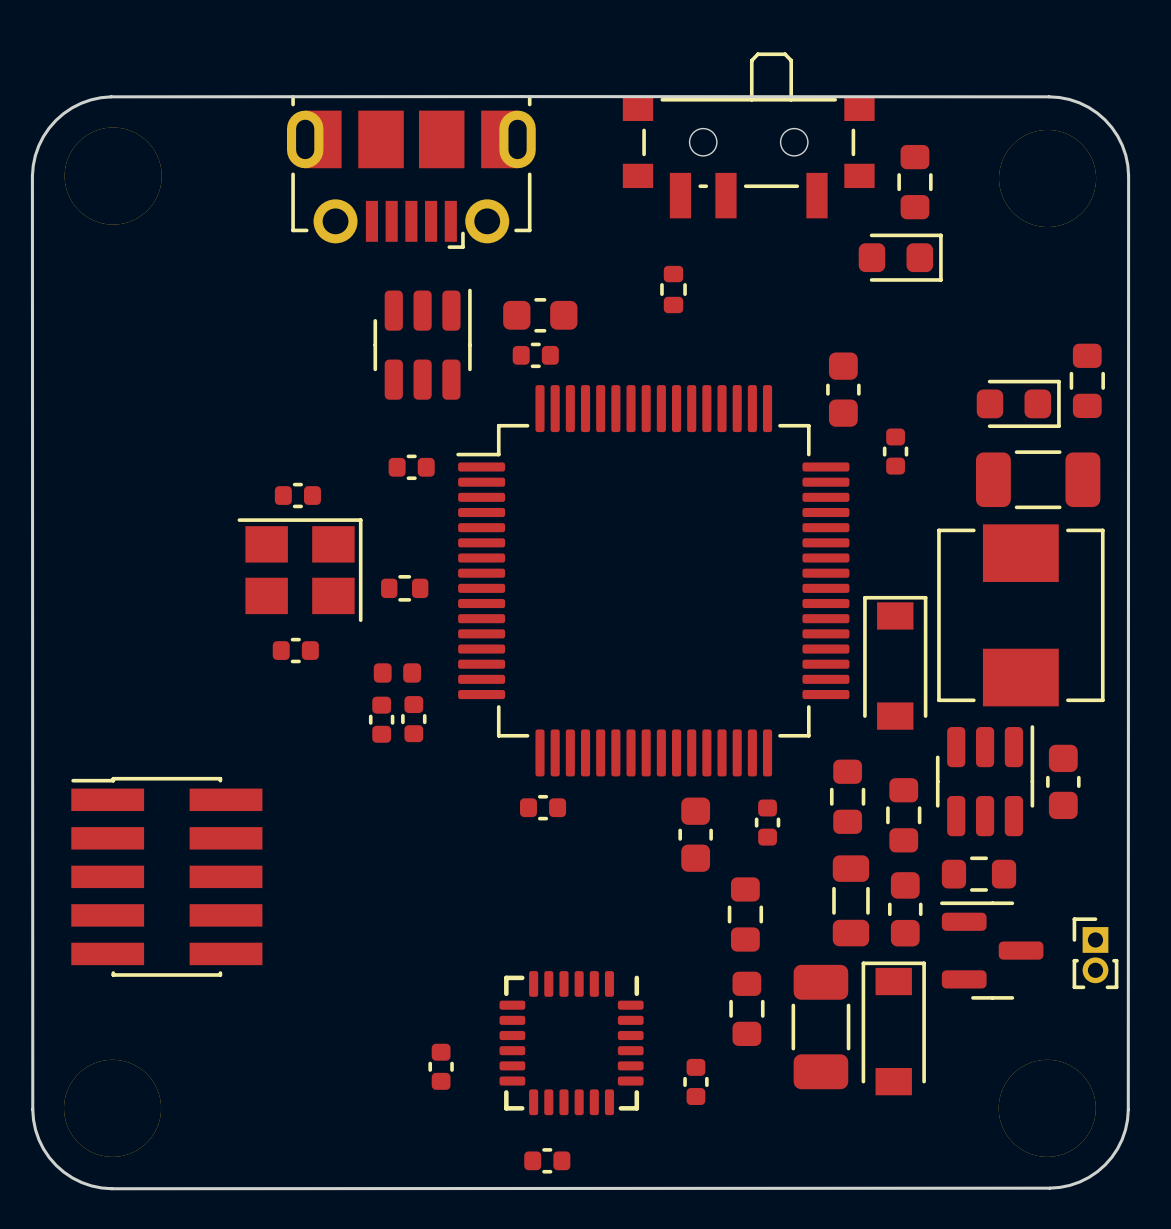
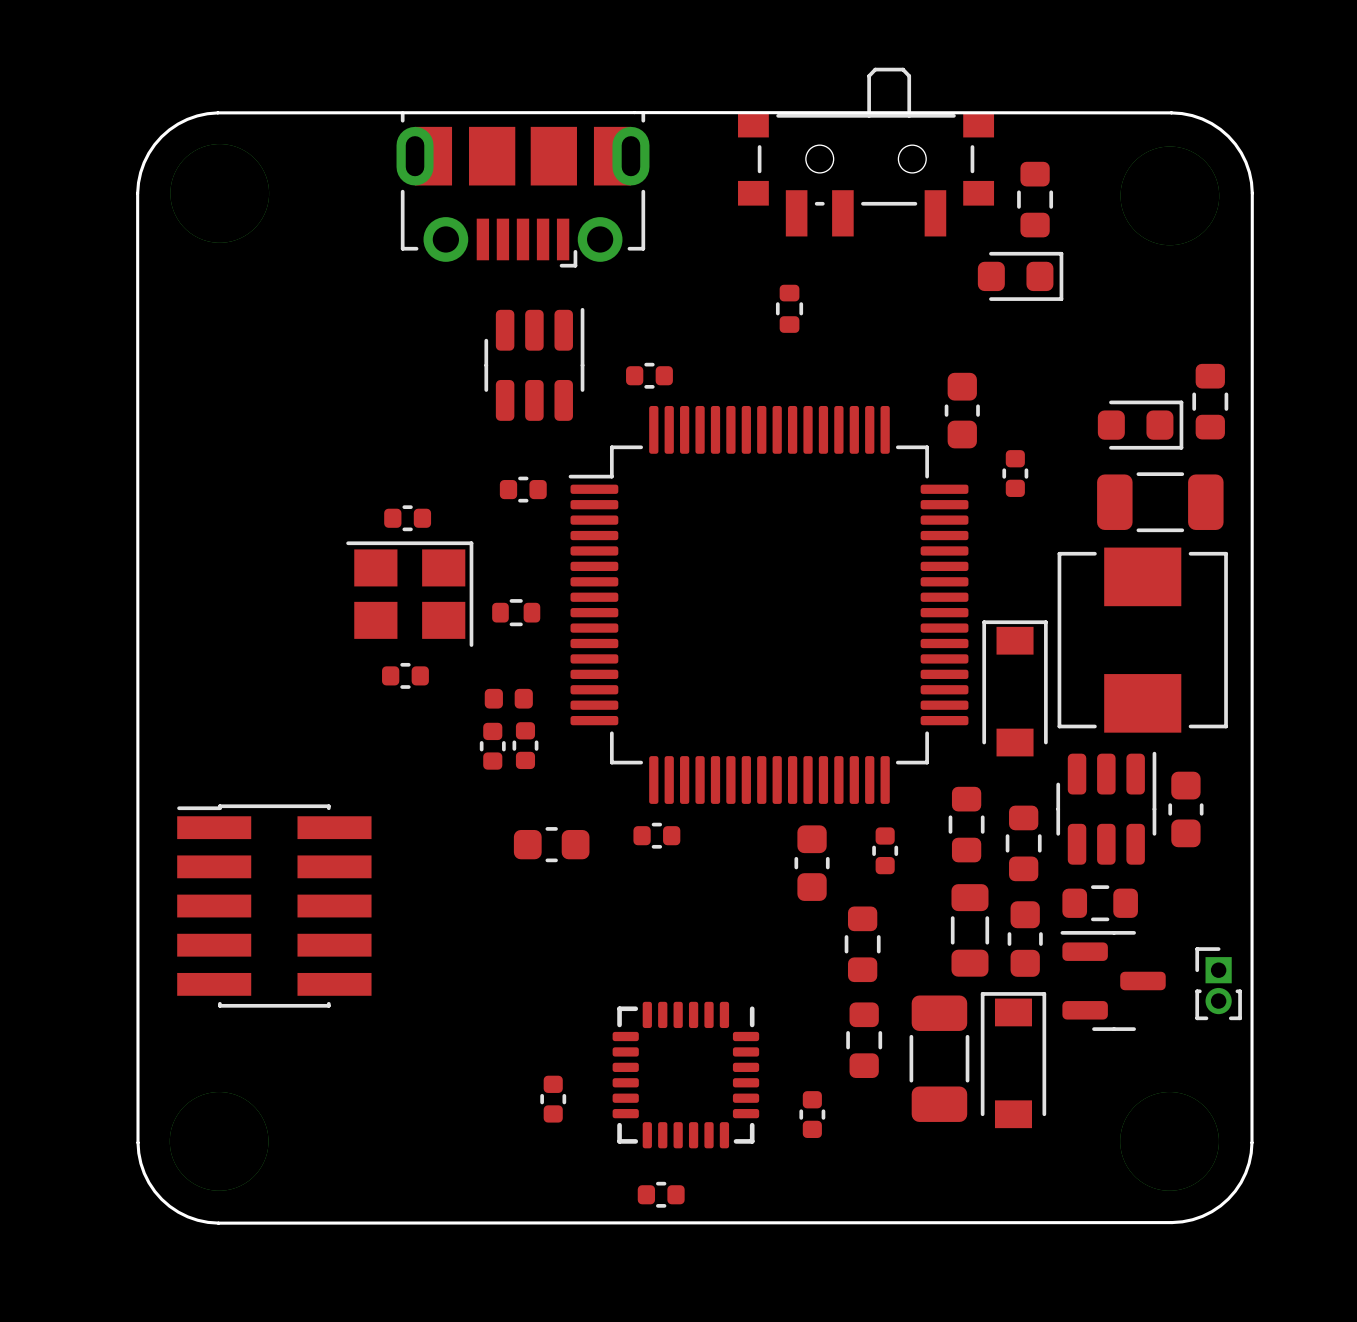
part position: (540, 315) -> (551, 844)

